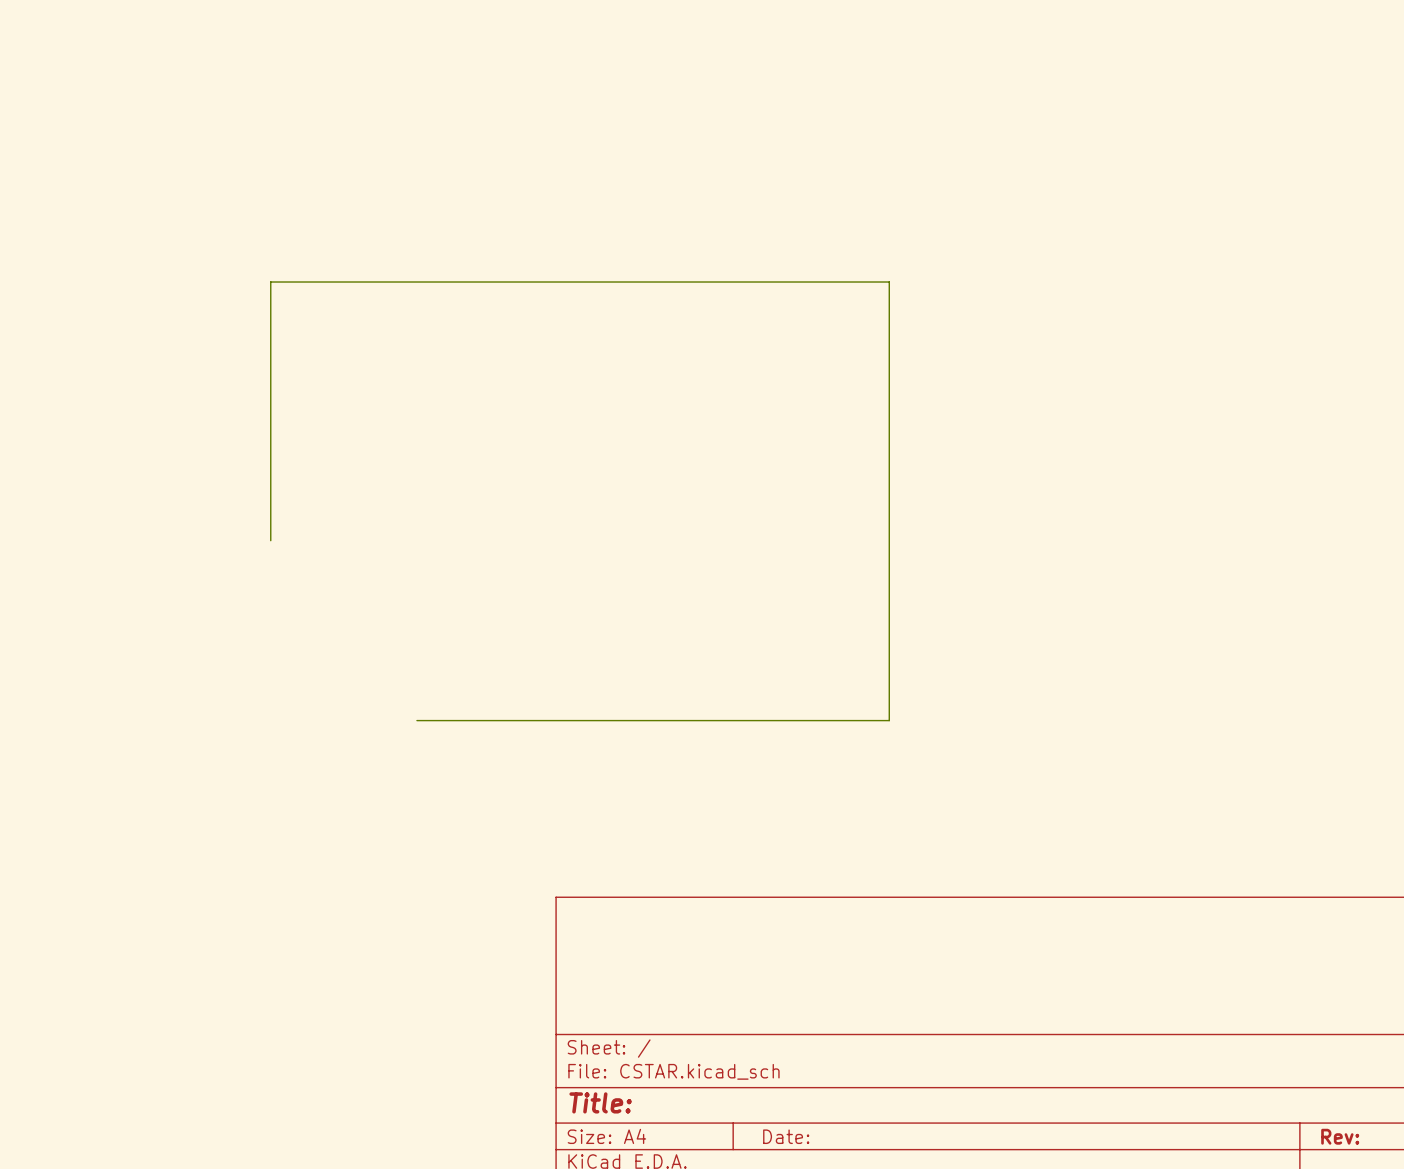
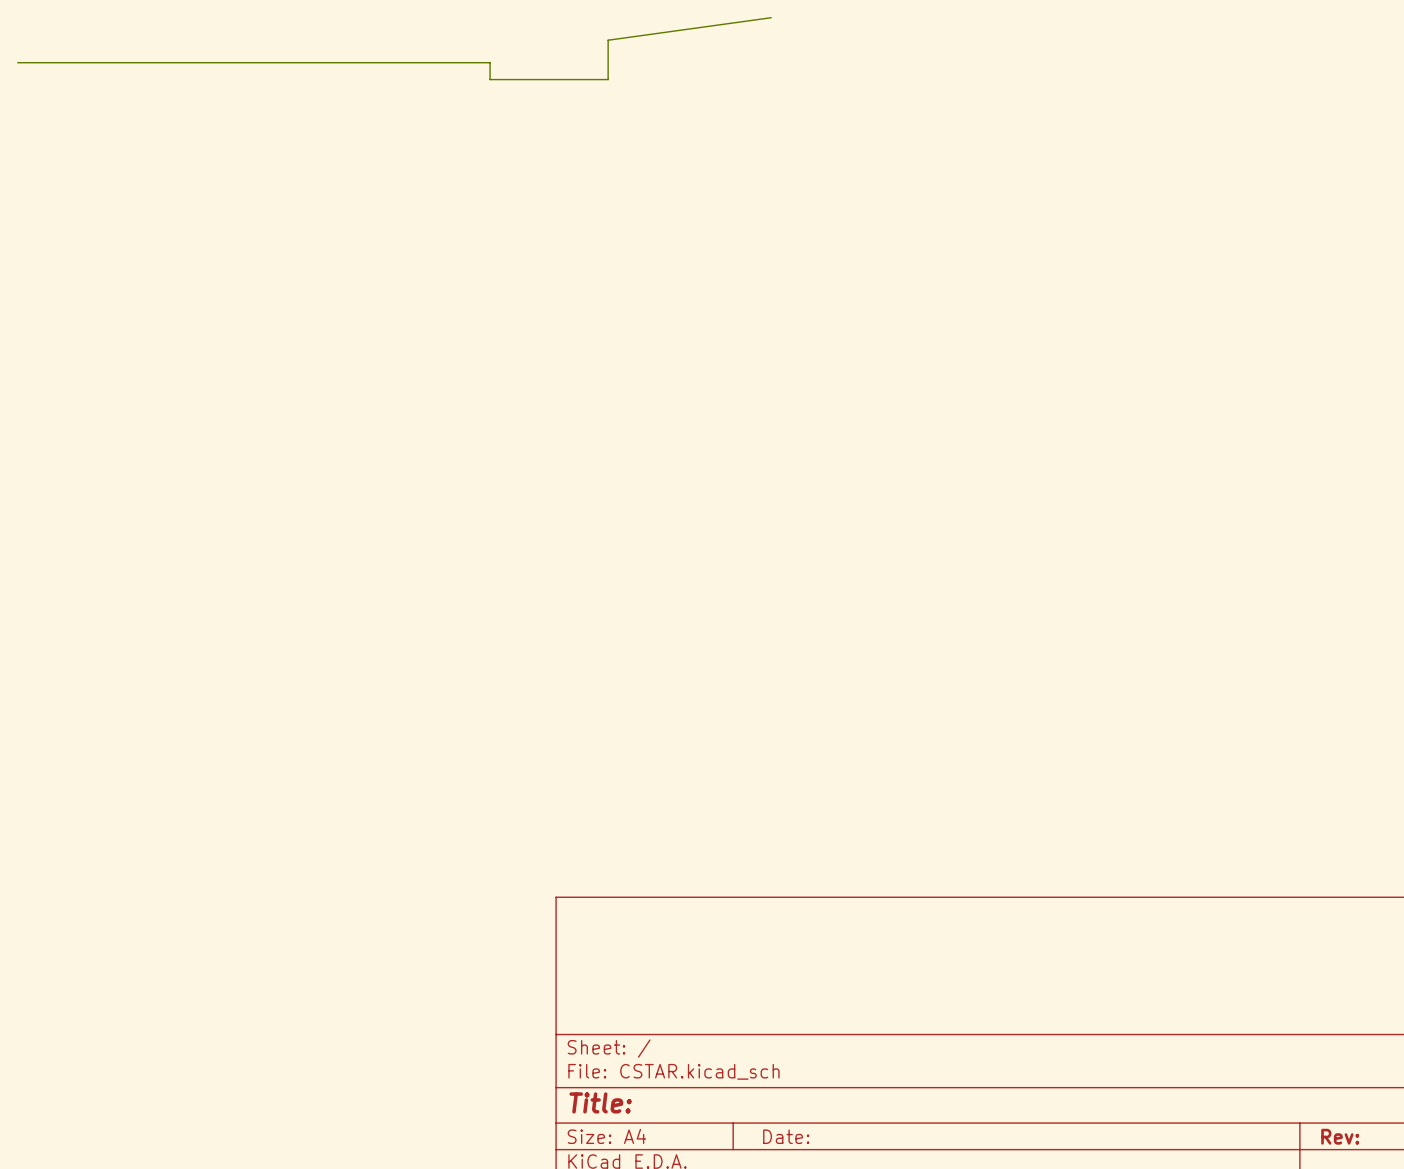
wire: none -> (771, 17) (608, 40) (608, 79) (490, 79) (490, 62) (17, 62)
wire: (270, 540) (270, 282) (889, 282) (889, 720) (416, 720) -> none

